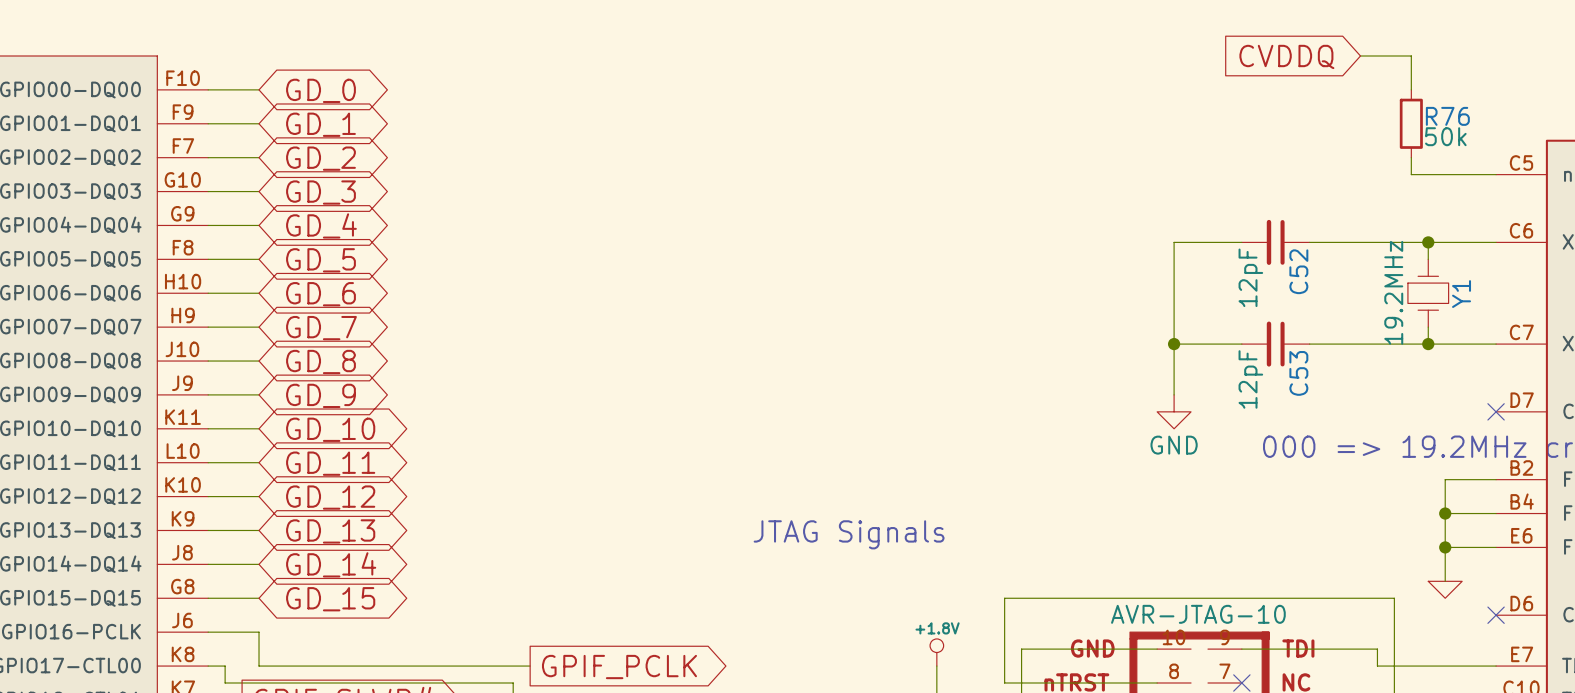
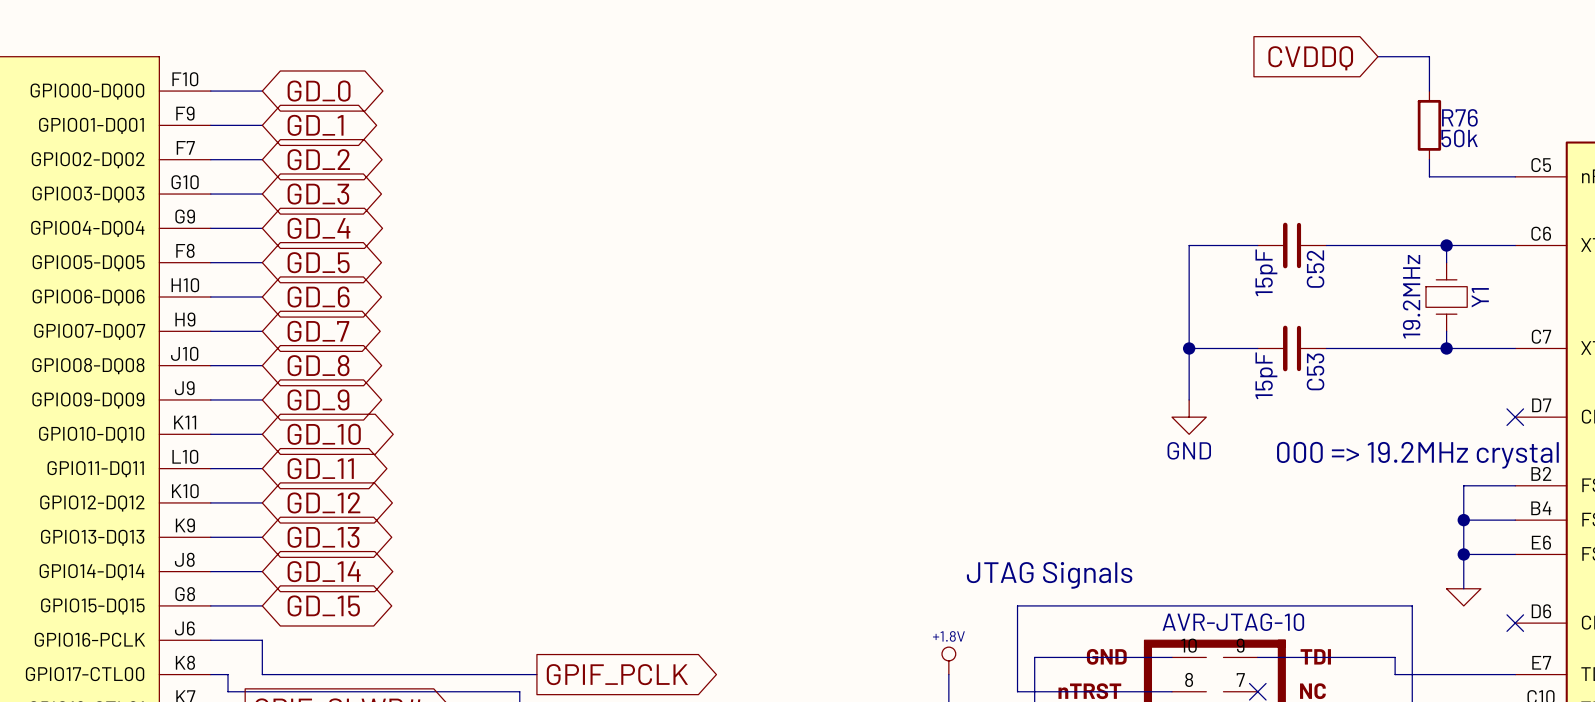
C52 value: 12pF (1250, 277) -> 15pF (1266, 272)
C53 value: 12pF (1250, 379) -> 15pF (1266, 375)
text position: JTAG Signals (849, 534) -> JTAG Signals (1049, 575)

